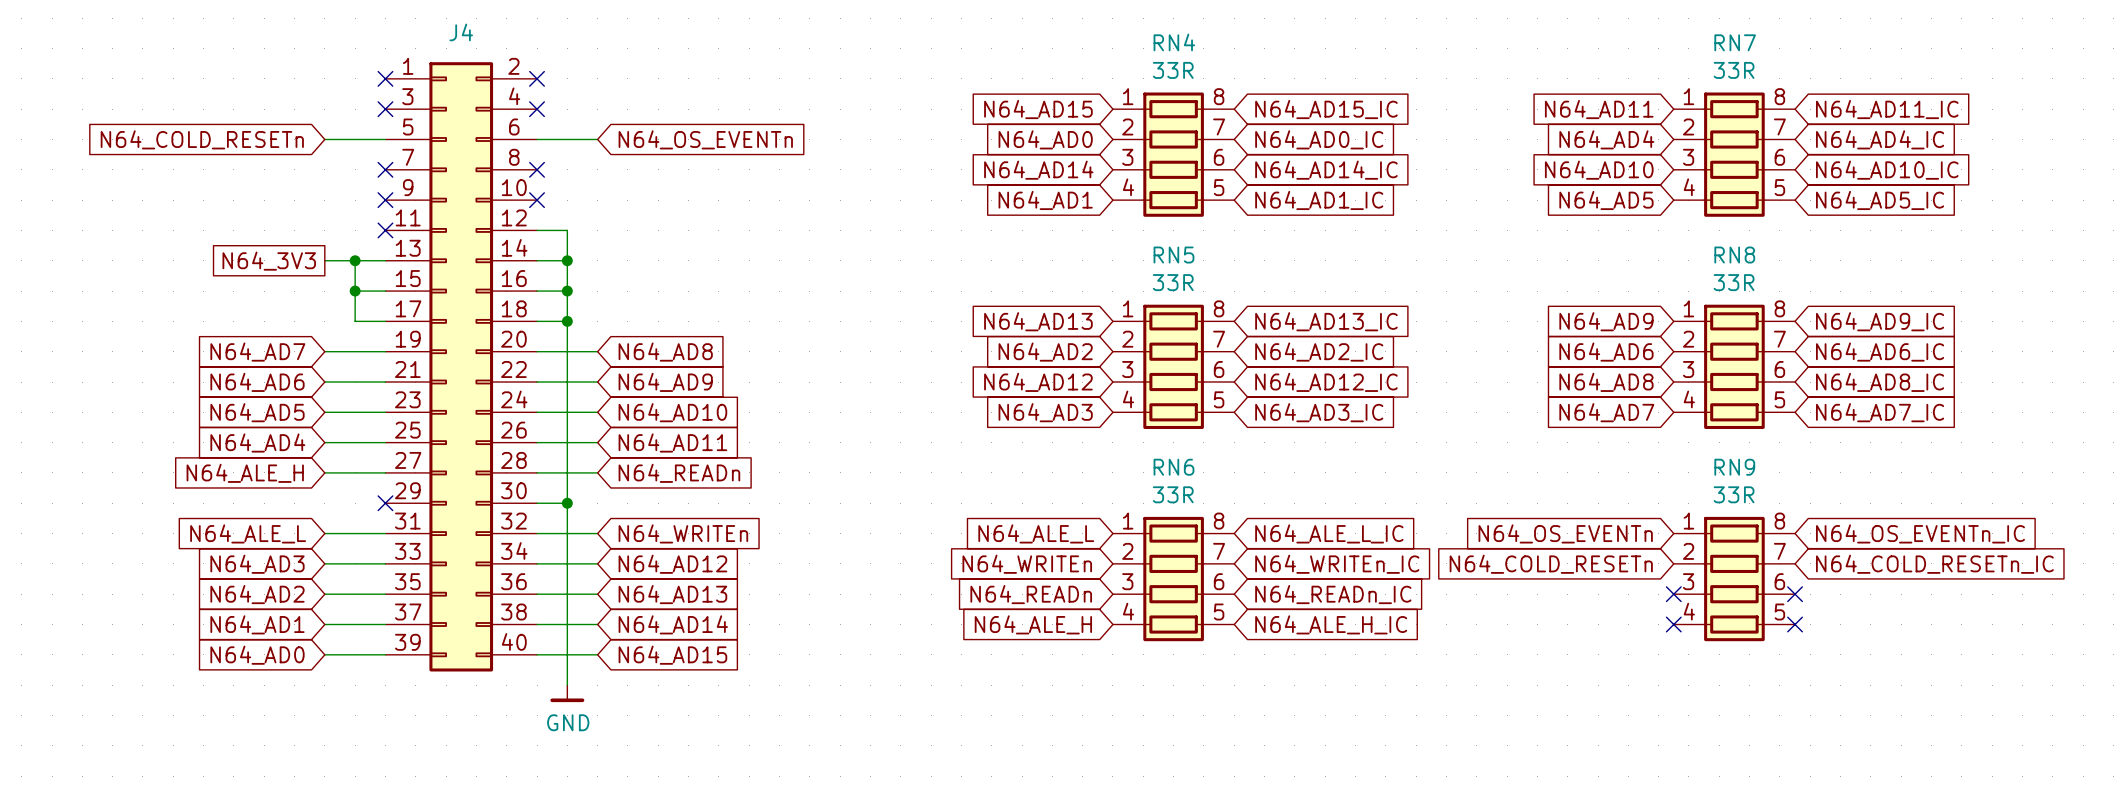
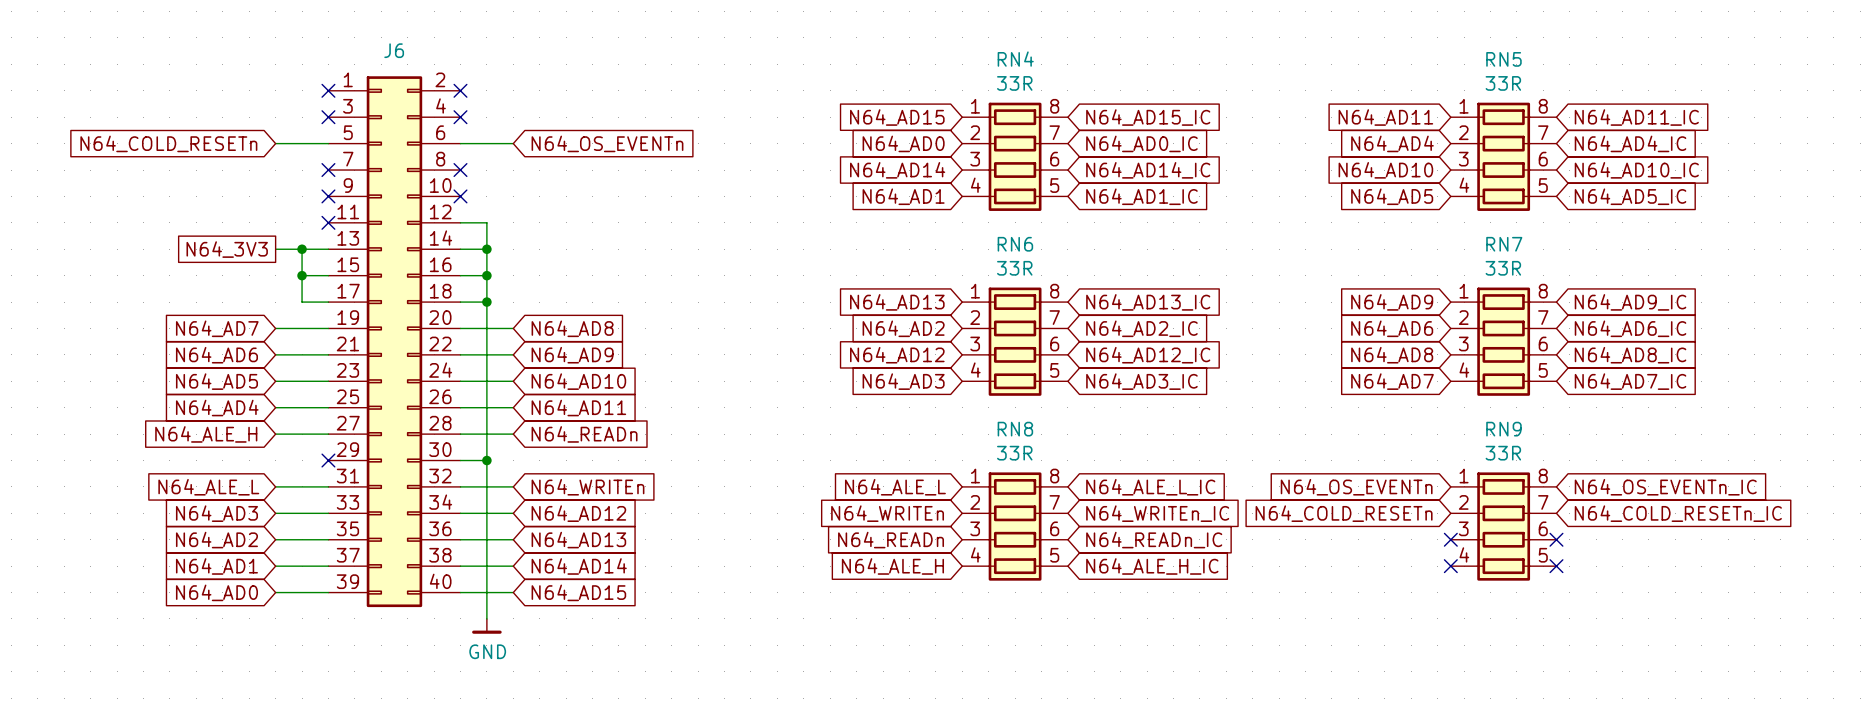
J4 name: J4 (461, 32) -> J6 (394, 50)
RN7 name: RN7 (1735, 42) -> RN5 (1503, 59)
RN5 name: RN5 (1173, 255) -> RN6 (1015, 244)
RN8 name: RN8 (1734, 255) -> RN7 (1504, 244)
RN6 name: RN6 (1173, 467) -> RN8 (1015, 429)

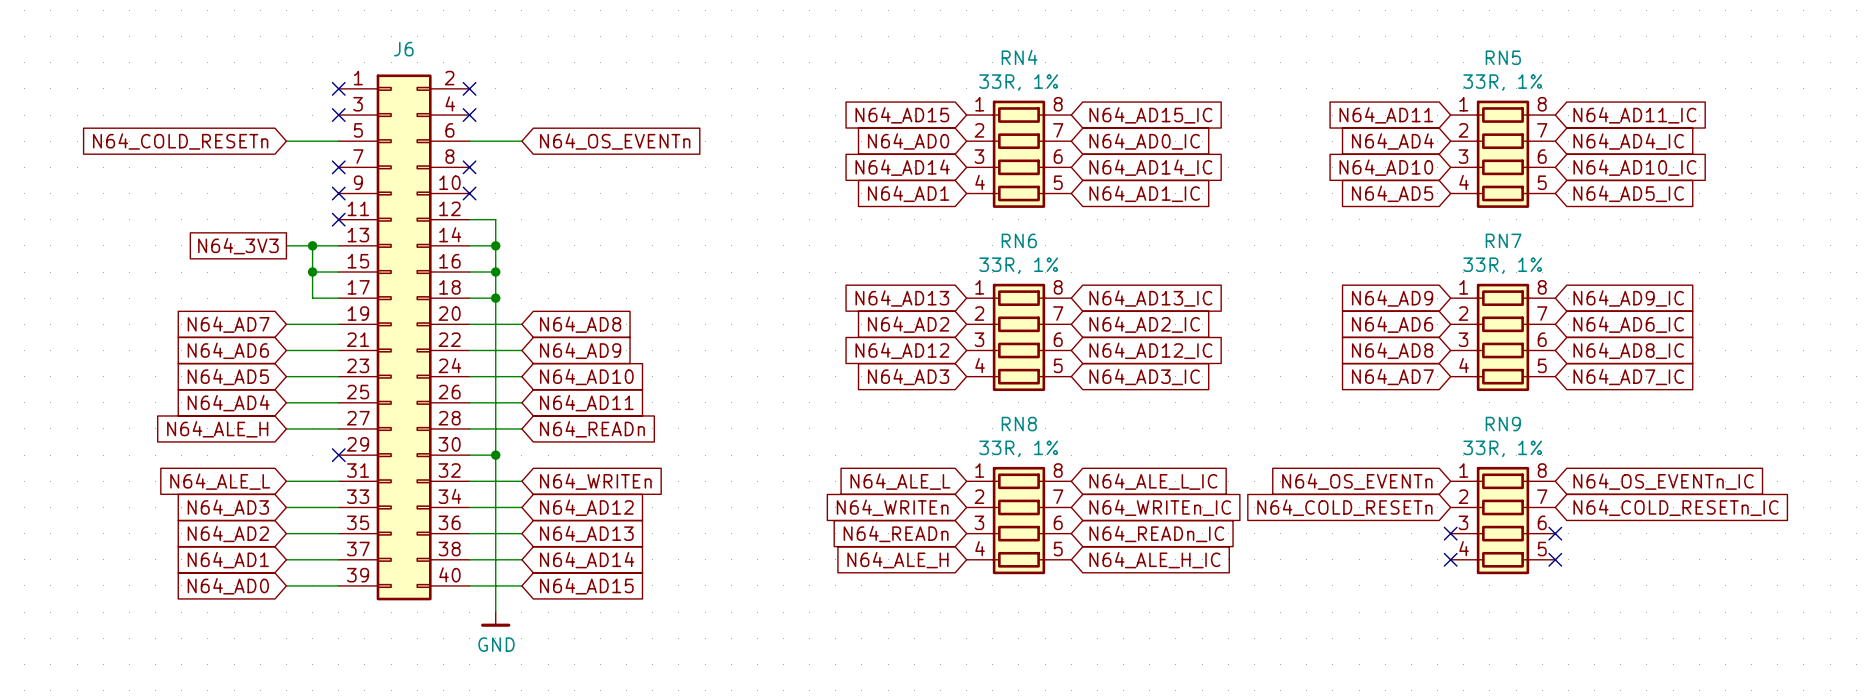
RN4 value: 33R (1014, 83) -> 33R, 1% (1018, 82)
RN5 value: 33R (1503, 83) -> 33R, 1% (1502, 82)
RN6 value: 33R (1014, 268) -> 33R, 1% (1018, 265)
RN7 value: 33R (1503, 268) -> 33R, 1% (1502, 265)
RN8 value: 33R (1014, 453) -> 33R, 1% (1018, 448)
RN9 value: 33R (1503, 453) -> 33R, 1% (1502, 448)

